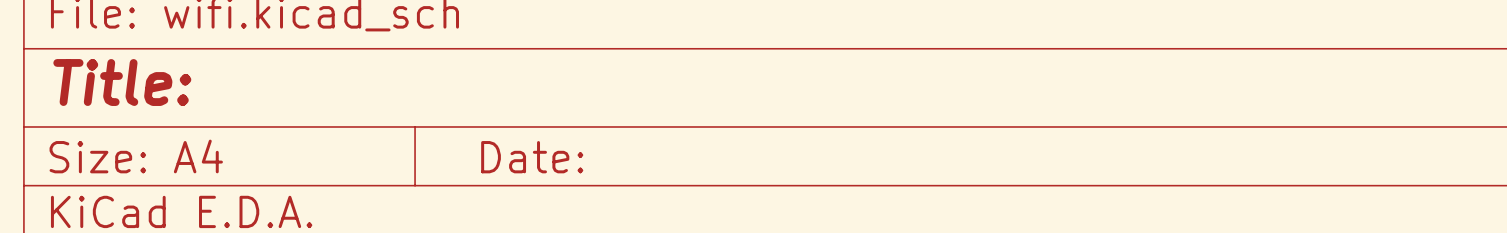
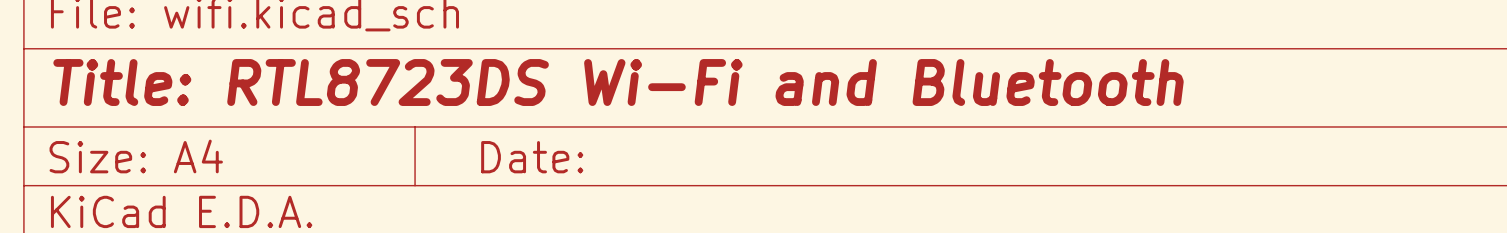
title block: Title: (122, 82) -> Title: RTL8723DS Wi-Fi and Bluetooth (618, 82)

